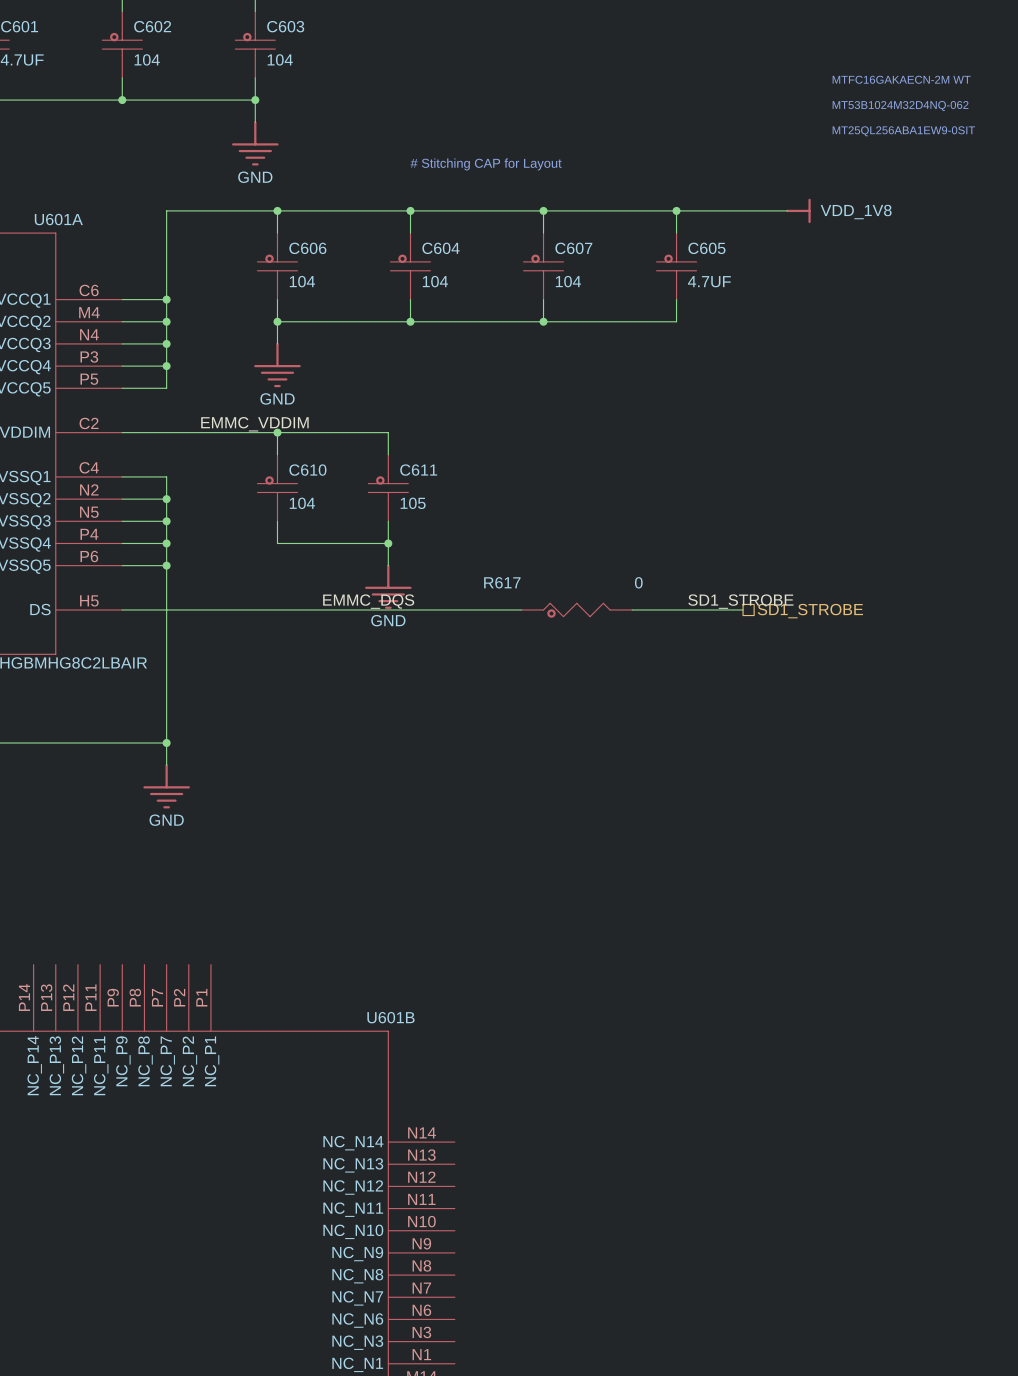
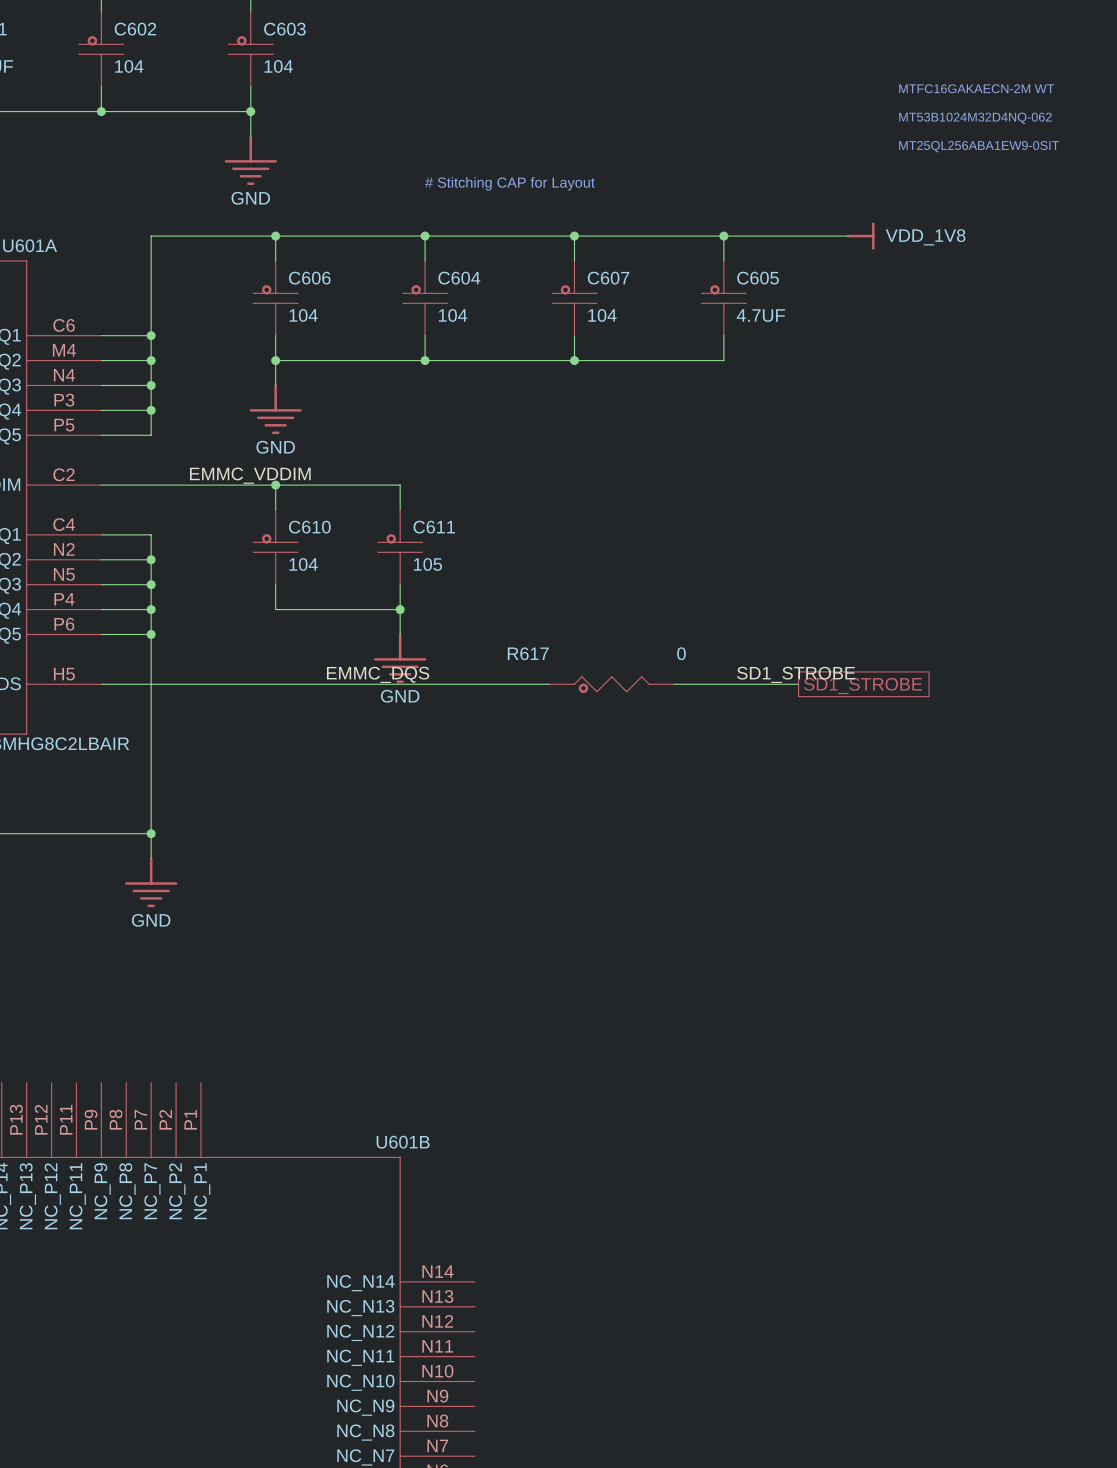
global label: none -> SD1_STROBE (863, 685)
hierarchical label: SD1_STROBE (810, 611) -> none

